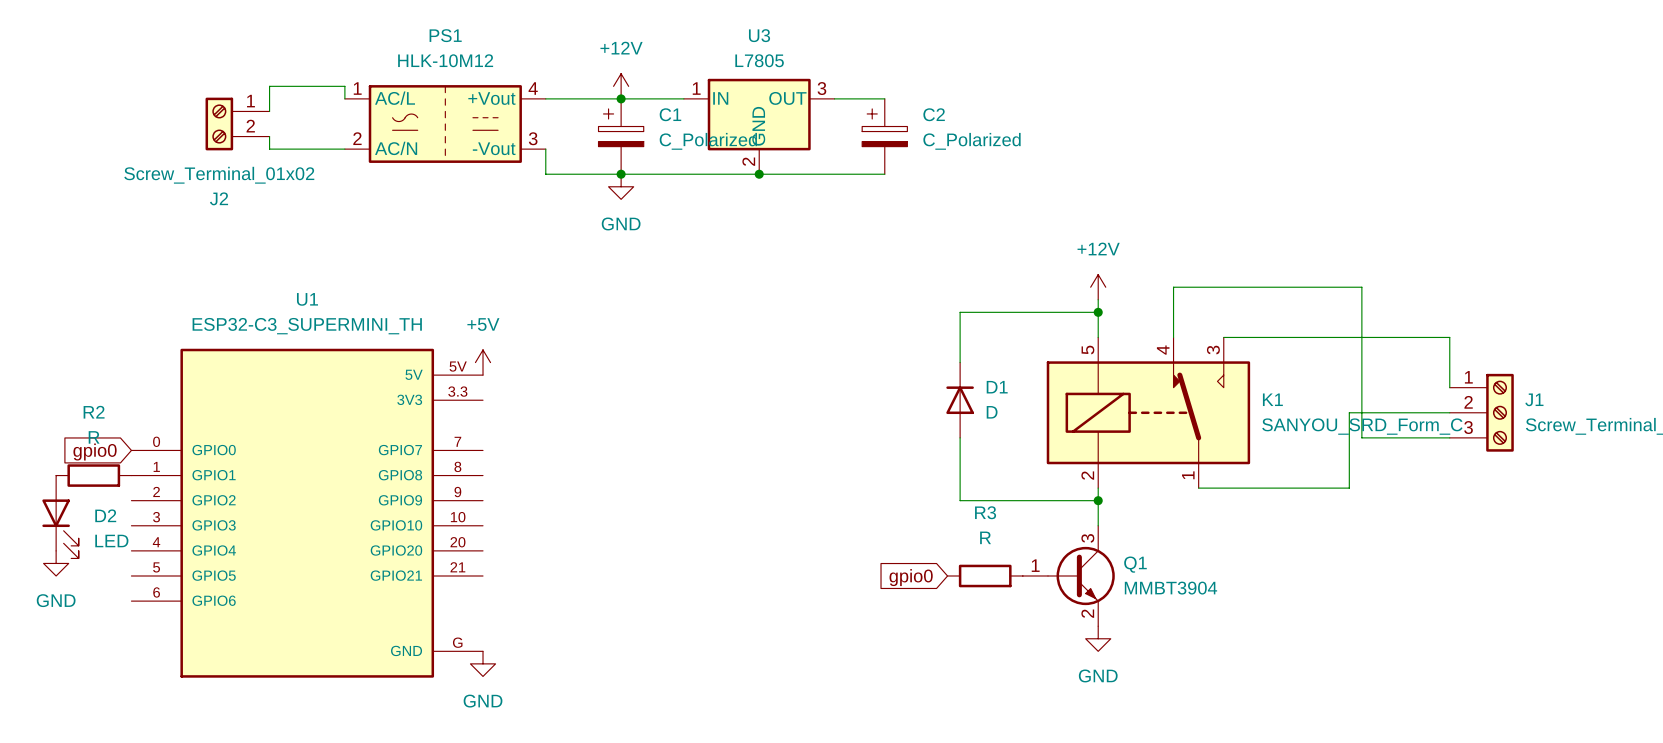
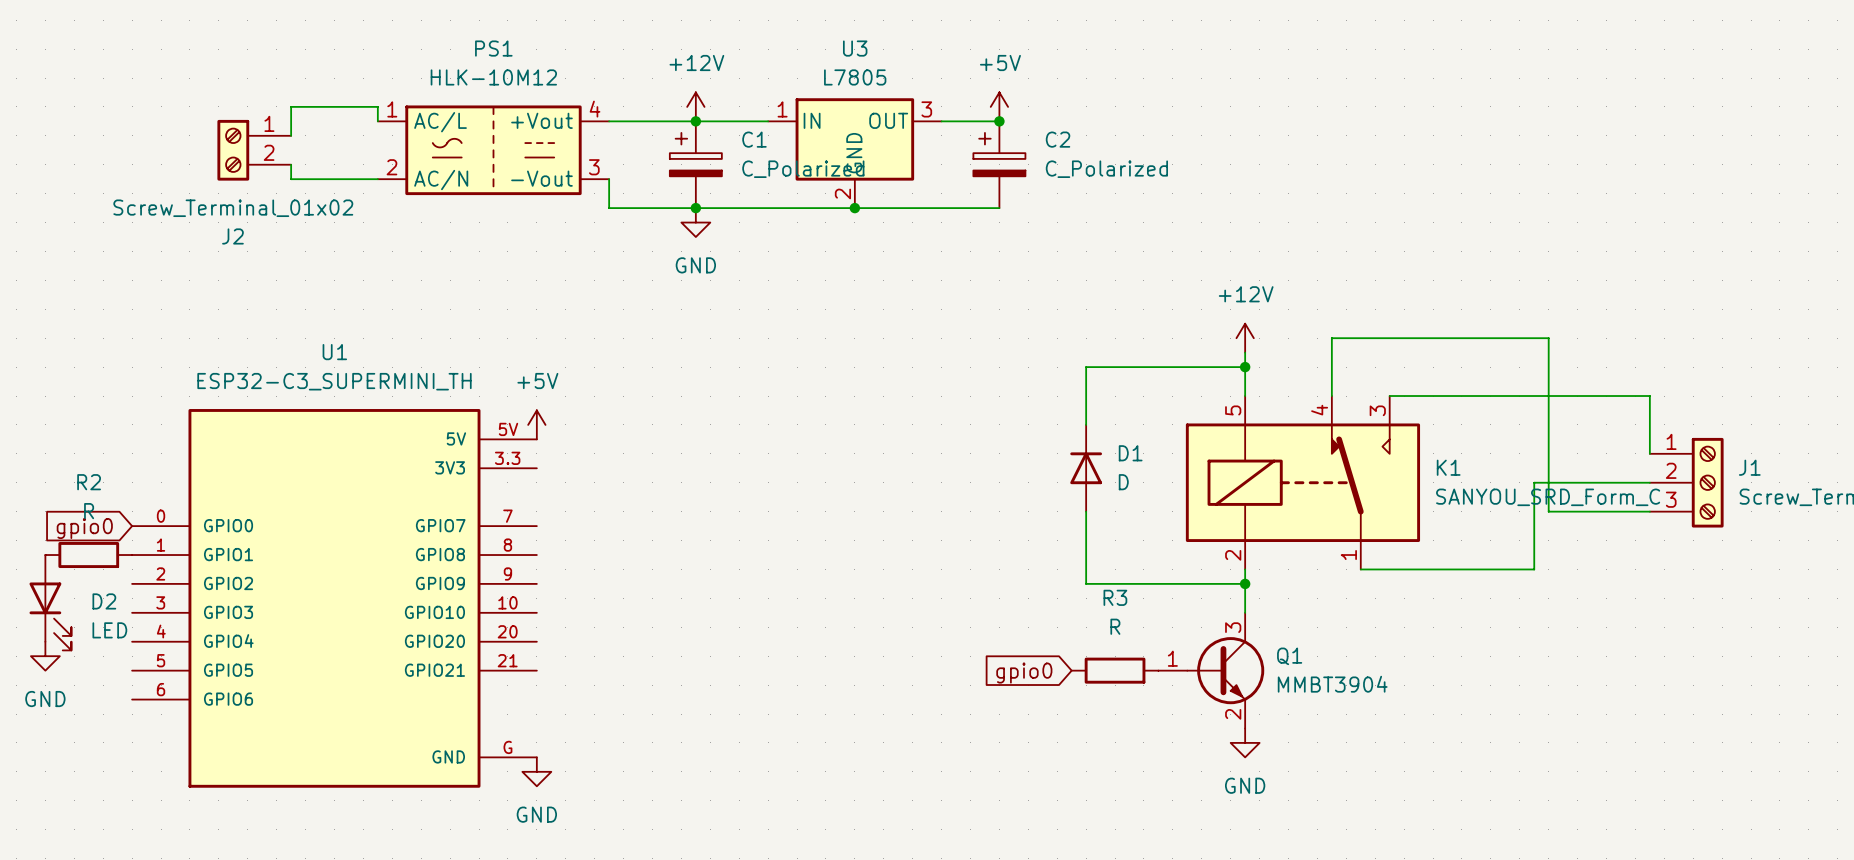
power symbol: none -> +5V (999, 106)
junction: none -> (999, 121)

